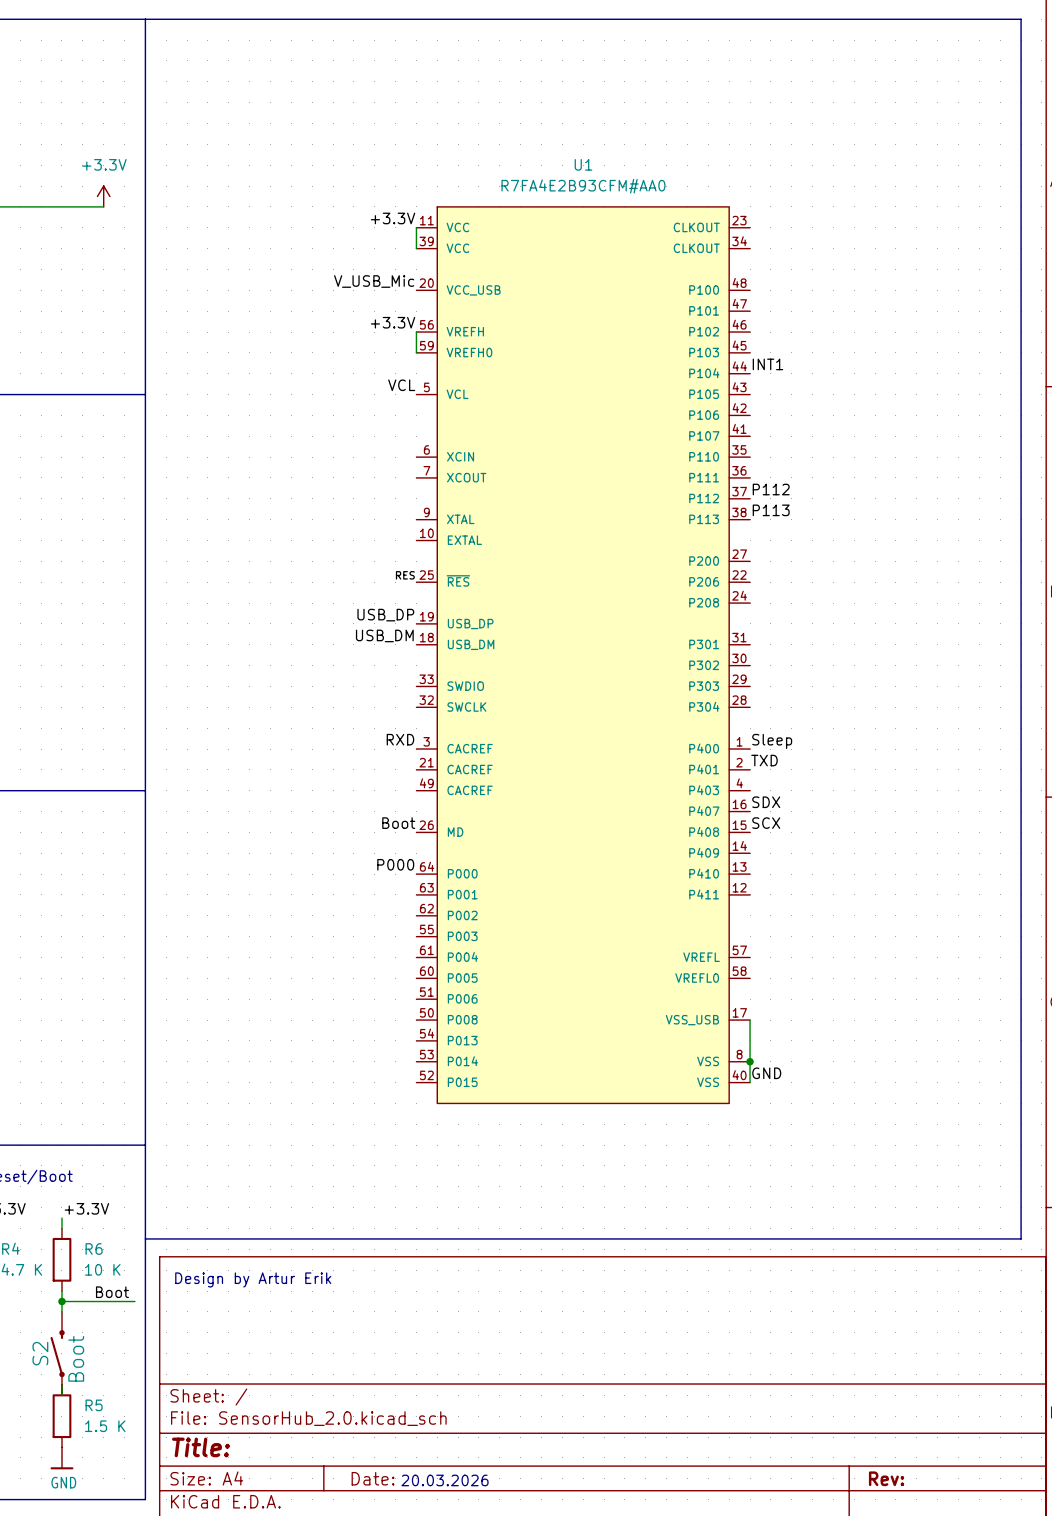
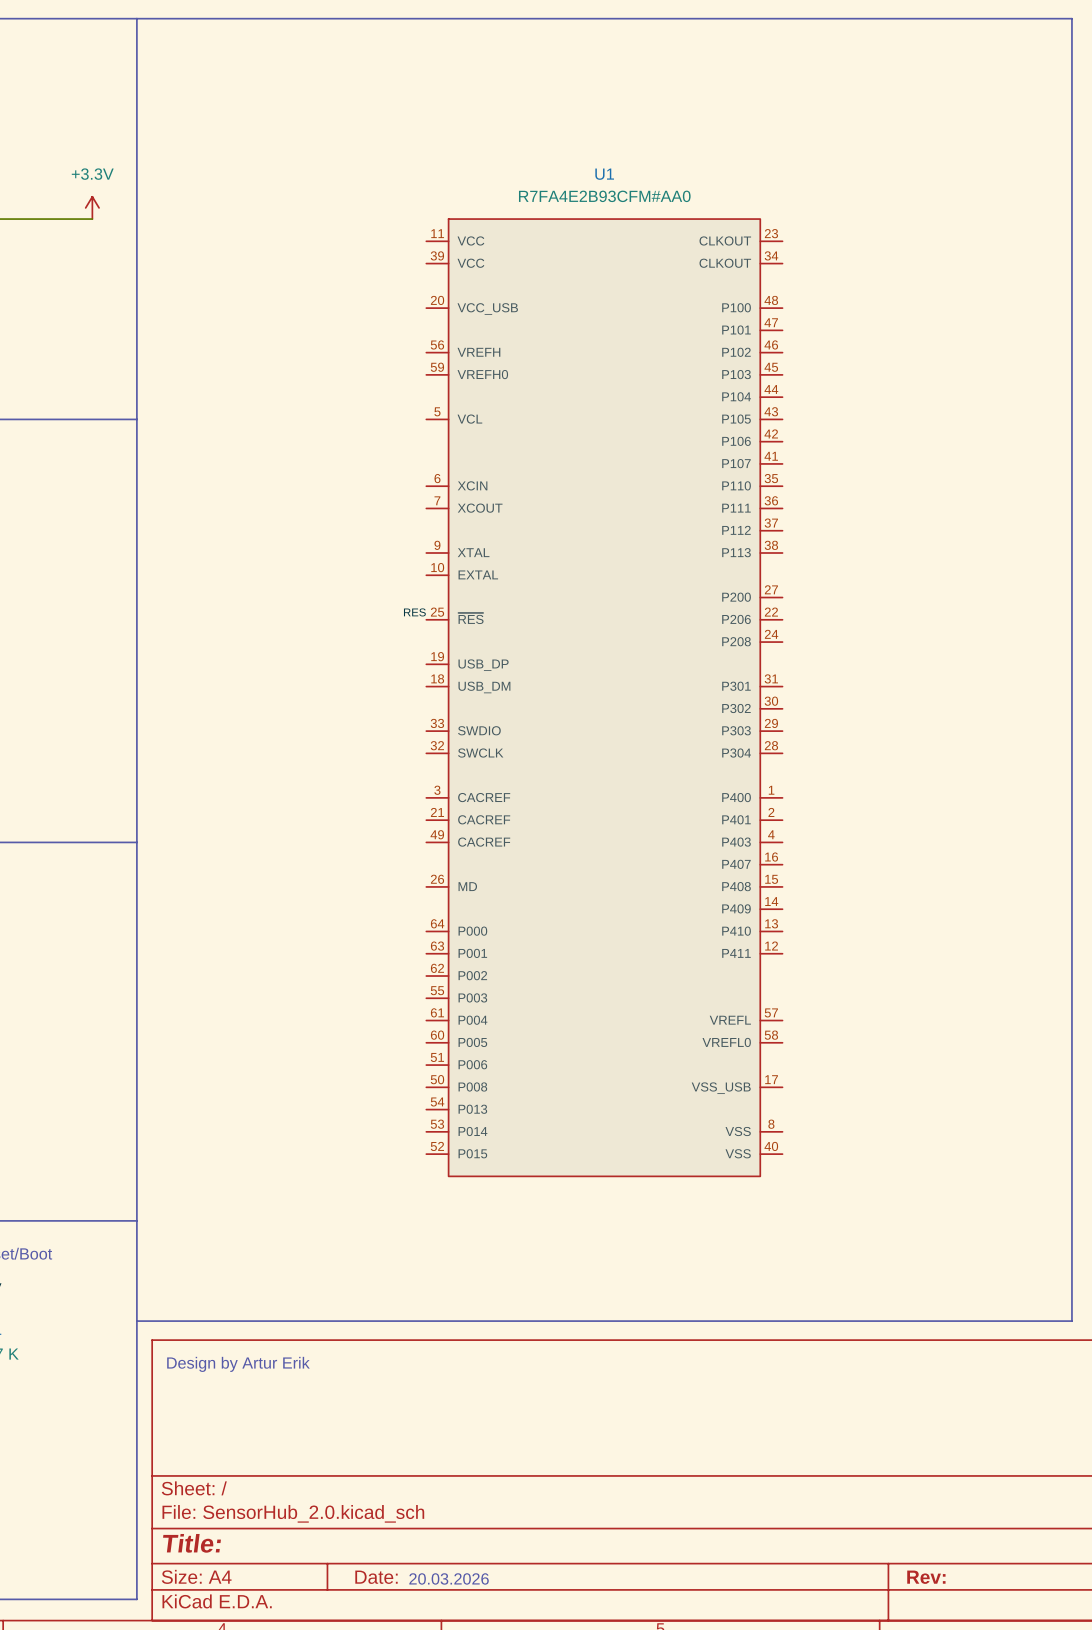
label: +3.3V (393, 218) -> none
wire: (416, 227) (416, 248) -> none
label: V_USB_Mic (374, 281) -> none
label: +3.3V (393, 322) -> none
wire: (416, 332) (416, 352) -> none
label: INT1 (767, 364) -> none
label: VCL (401, 385) -> none
label: P112 (771, 489) -> none
label: P113 (771, 510) -> none
label: USB_DP (385, 615) -> none
label: USB_DM (384, 635) -> none
label: RXD (400, 739) -> none
label: Sleep (772, 741) -> none
label: TXD (764, 760) -> none
label: SDX (766, 802) -> none
label: Boot (398, 823) -> none
label: SCX (766, 823) -> none
label: P000 (395, 864) -> none
wire: (750, 1020) (750, 1082) -> none
junction: (750, 1061) -> none
label: GND (766, 1073) -> none
label: +3.3V (86, 1208) -> none
wire: (61, 1218) (61, 1228) -> none
R6: 10 K (61, 1259) -> none
wire: (61, 1291) (61, 1311) -> none
label: Boot (112, 1292) -> none
wire: (61, 1301) (134, 1301) -> none
junction: (61, 1301) -> none
S2: Boot (57, 1353) -> none
wire: (61, 1384) (61, 1395) -> none
R5: 1.5 K (61, 1416) -> none
power symbol: GND (61, 1458) -> none

